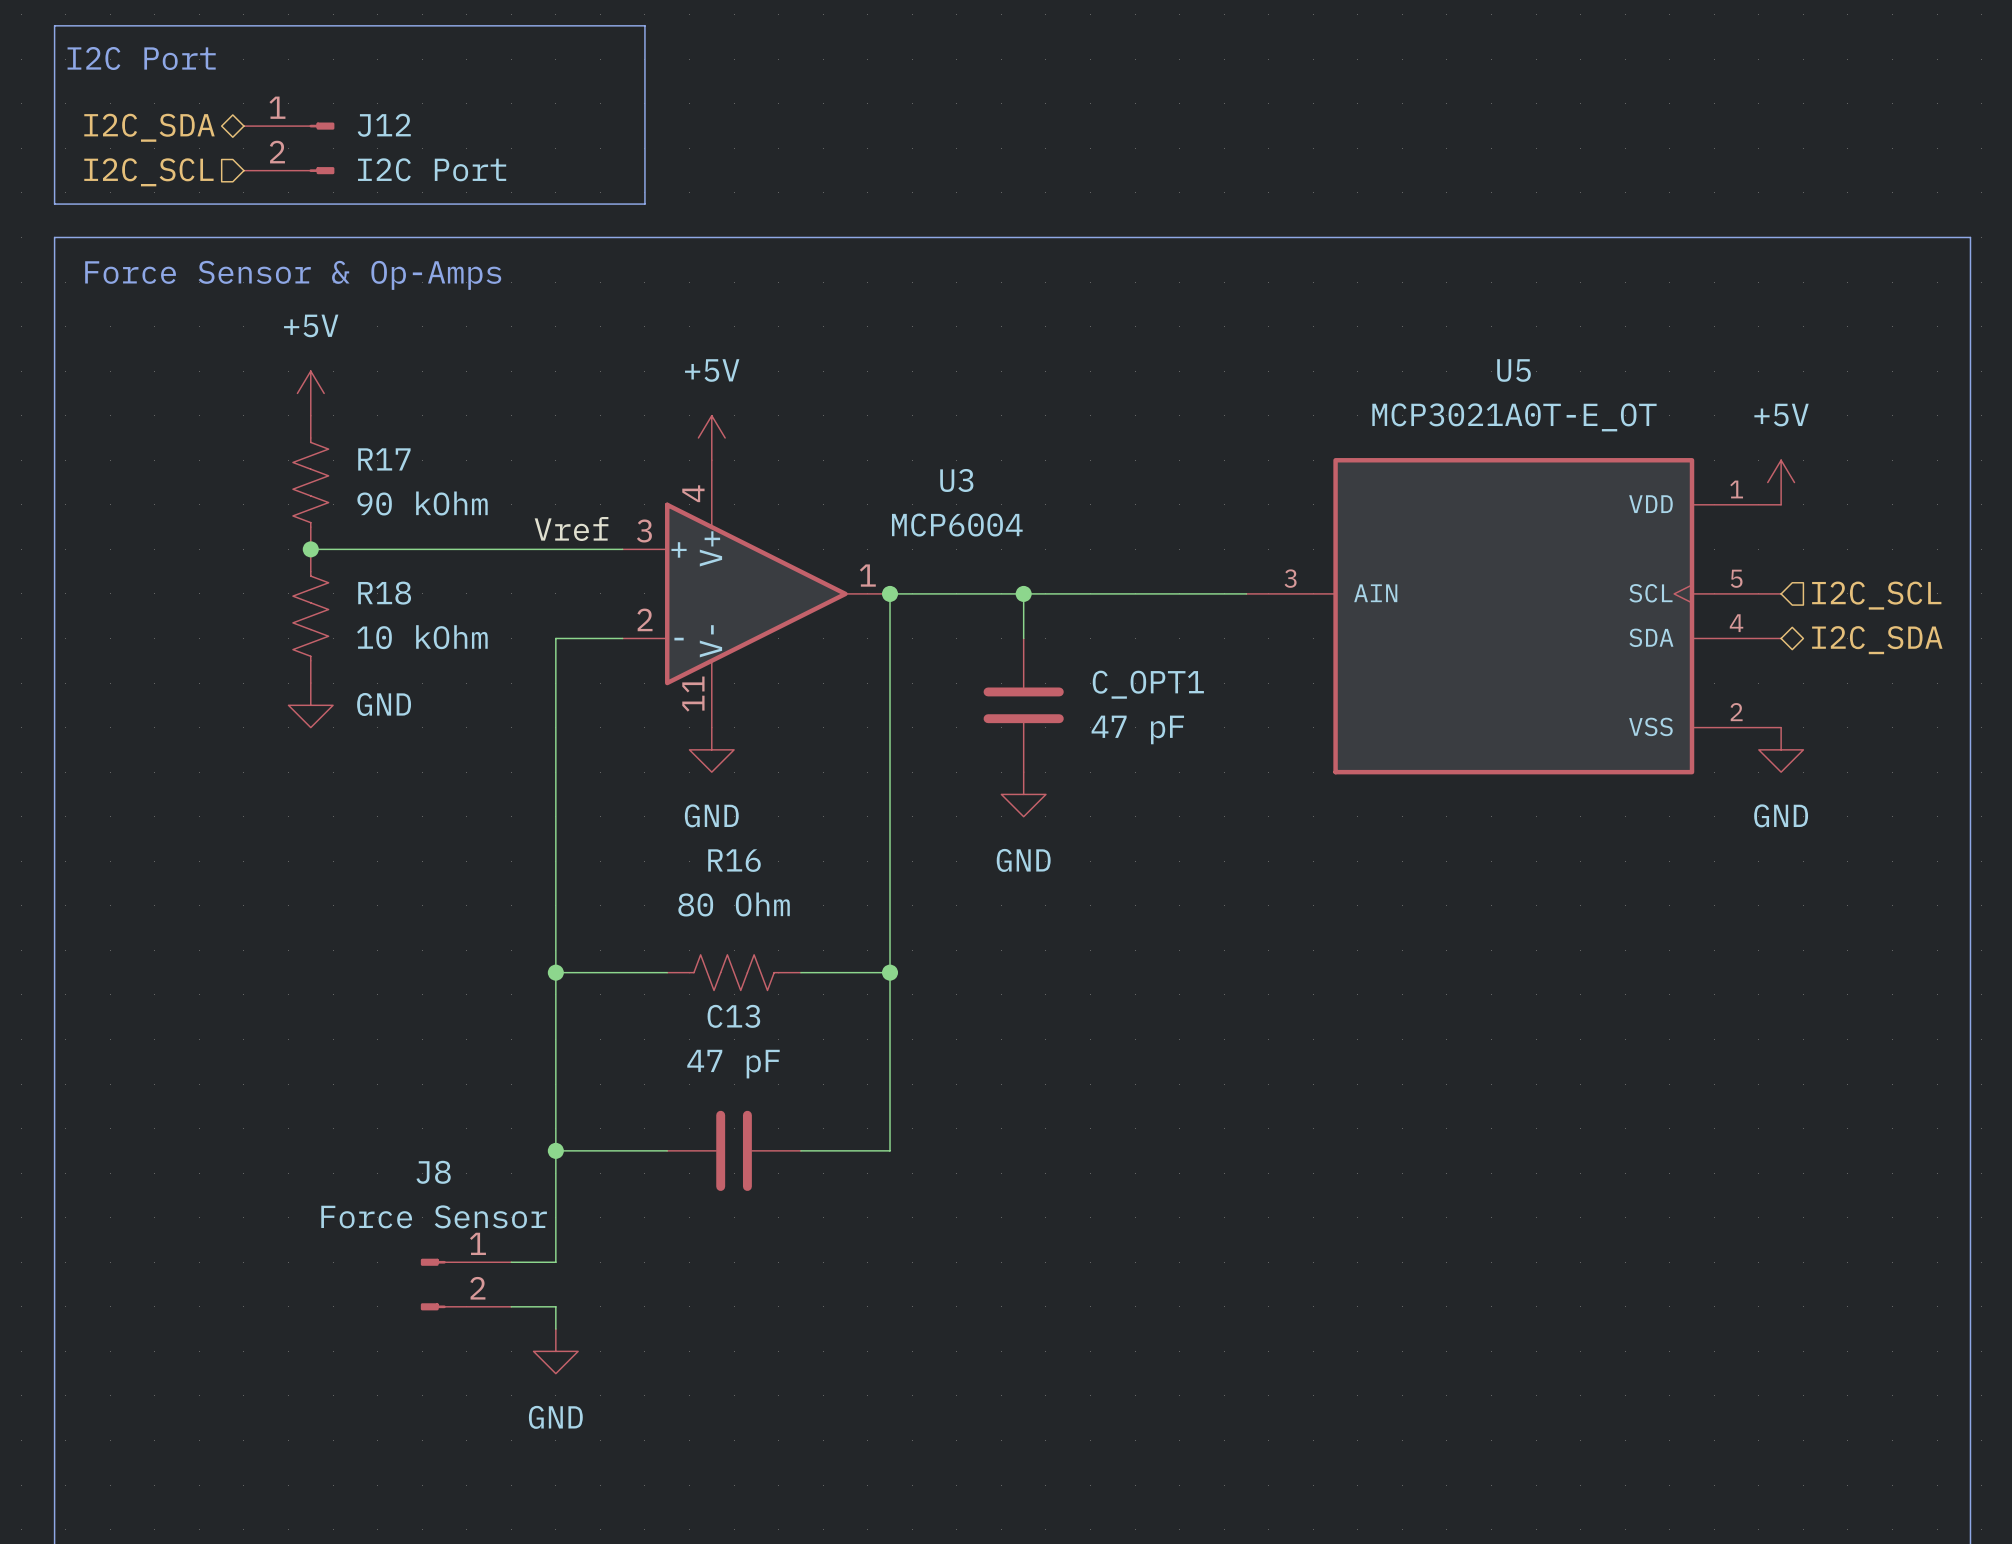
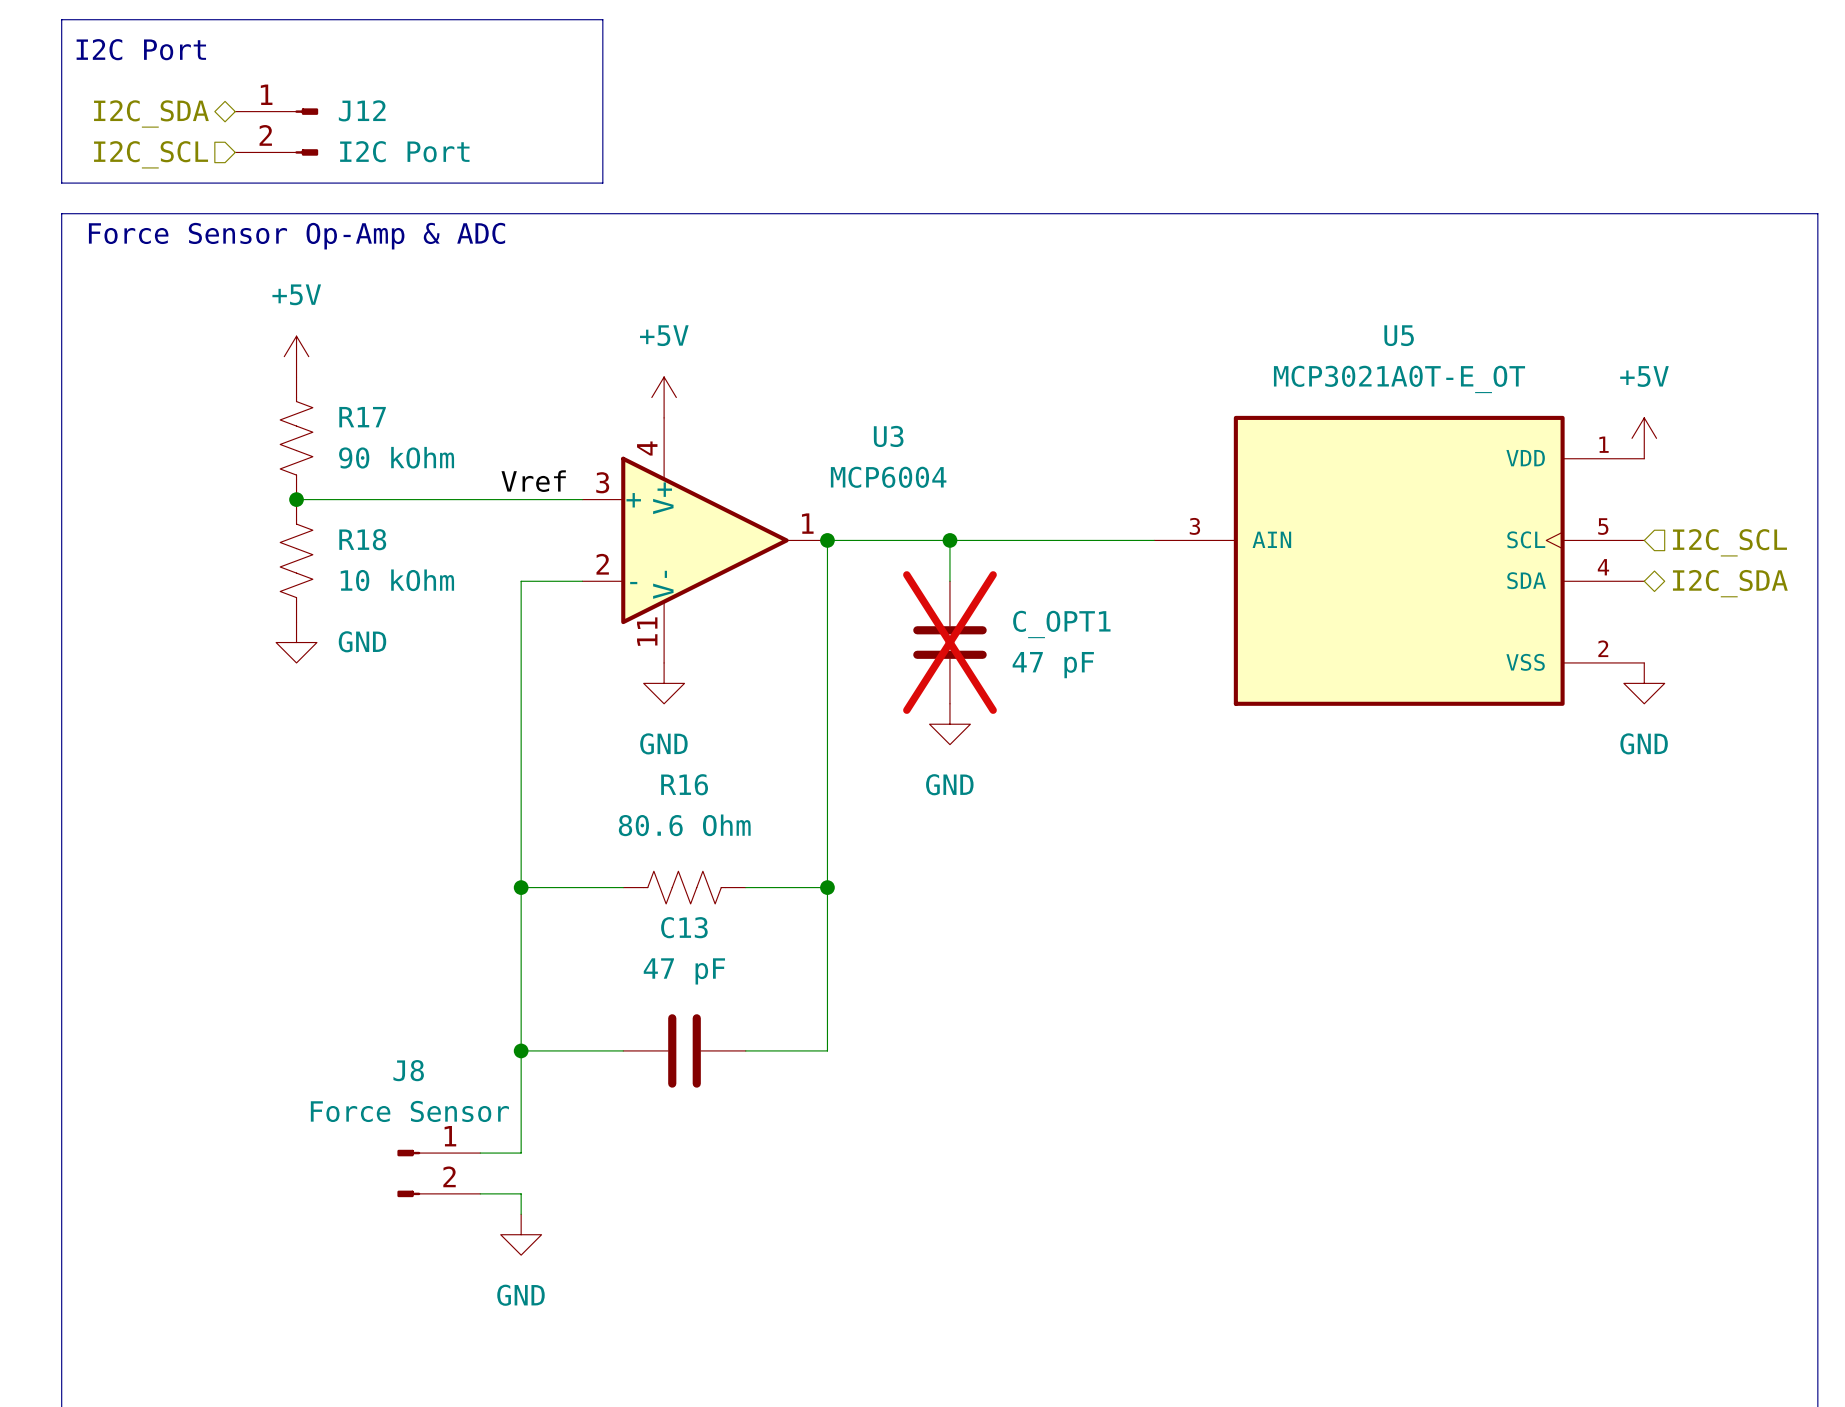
text: Force Sensor & Op-Amps (293, 275) -> Force Sensor Op-Amp & ADC (297, 236)
C_OPT1 do-not-place cross: none -> (949, 642)
R16 value: 80 Ohm (734, 904) -> 80.6 Ohm (684, 825)

